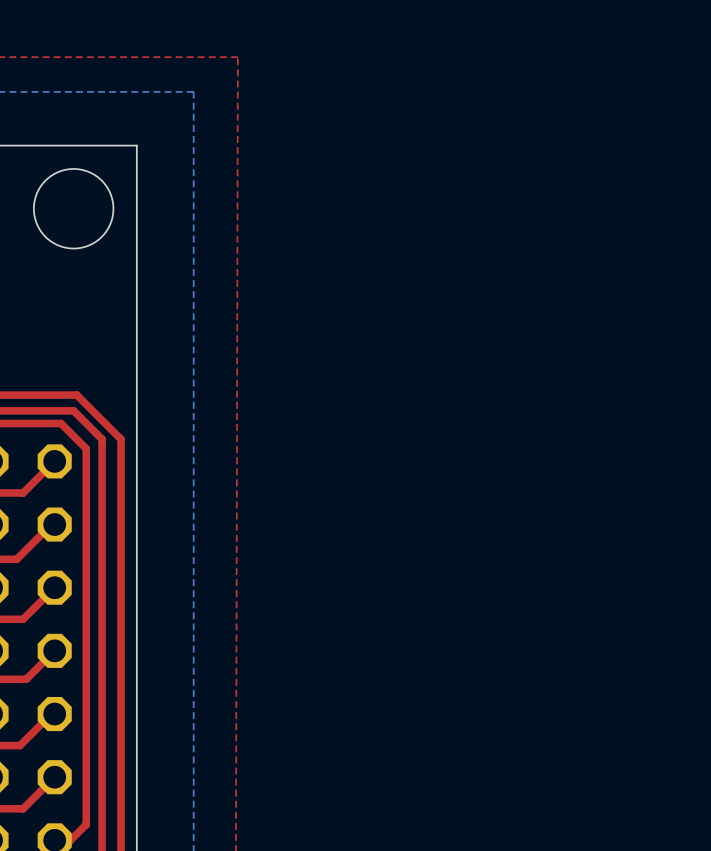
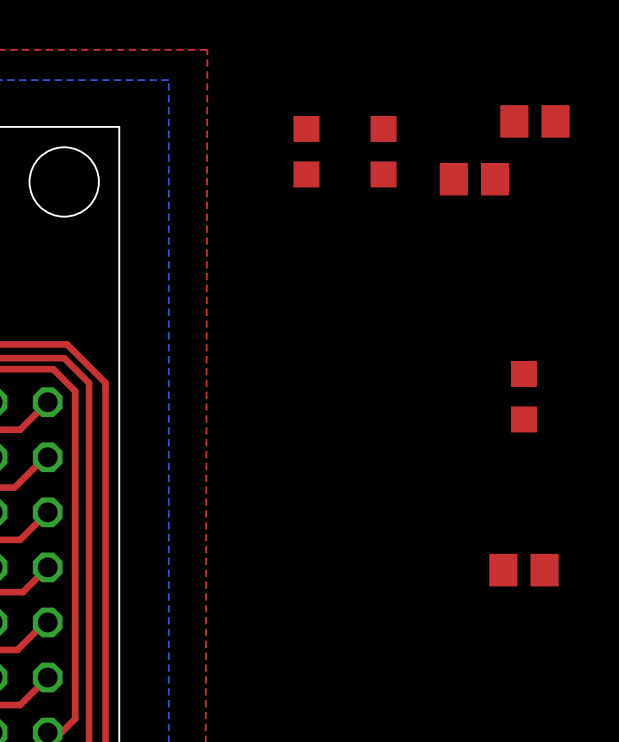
part: none -> (534, 121)
part: none -> (306, 151)
part: none -> (383, 151)
part: none -> (474, 179)
part: none -> (523, 396)
part: none -> (523, 570)

